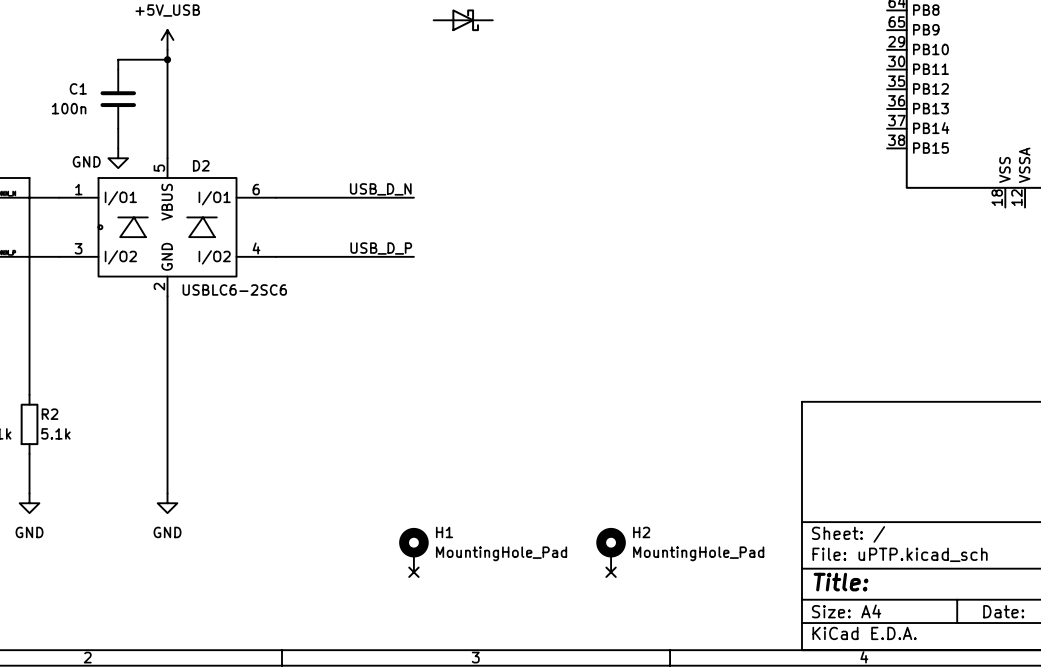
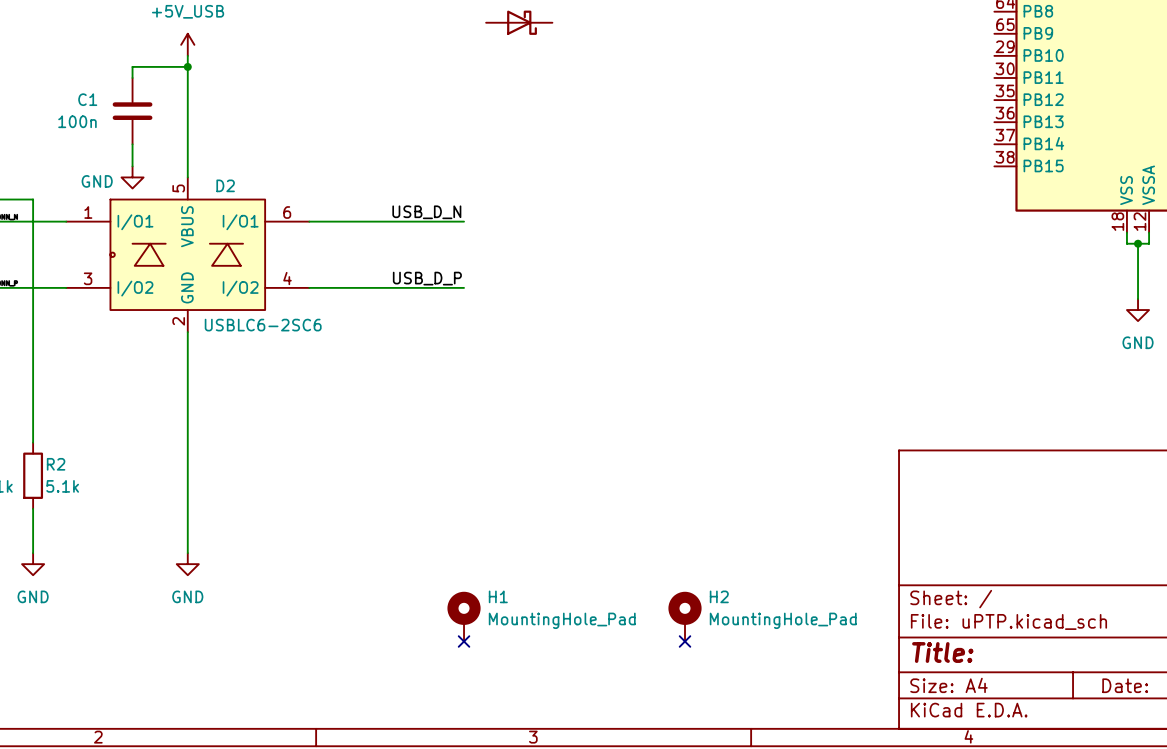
wire: none -> (1126, 232) (1126, 243) (1149, 243) (1149, 232)
wire: none -> (1138, 243) (1138, 298)
junction: none -> (1138, 243)
power symbol: none -> GND (1138, 310)

